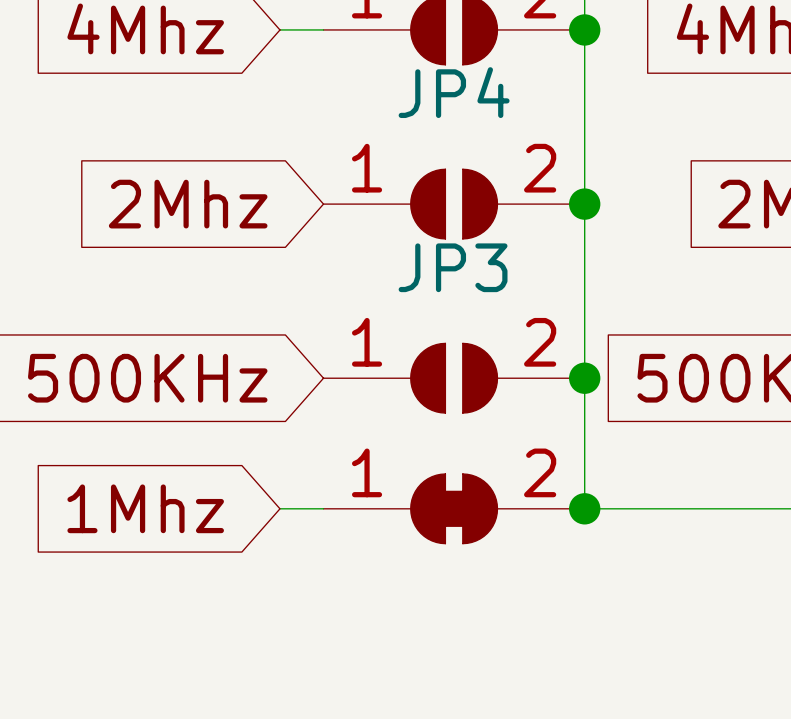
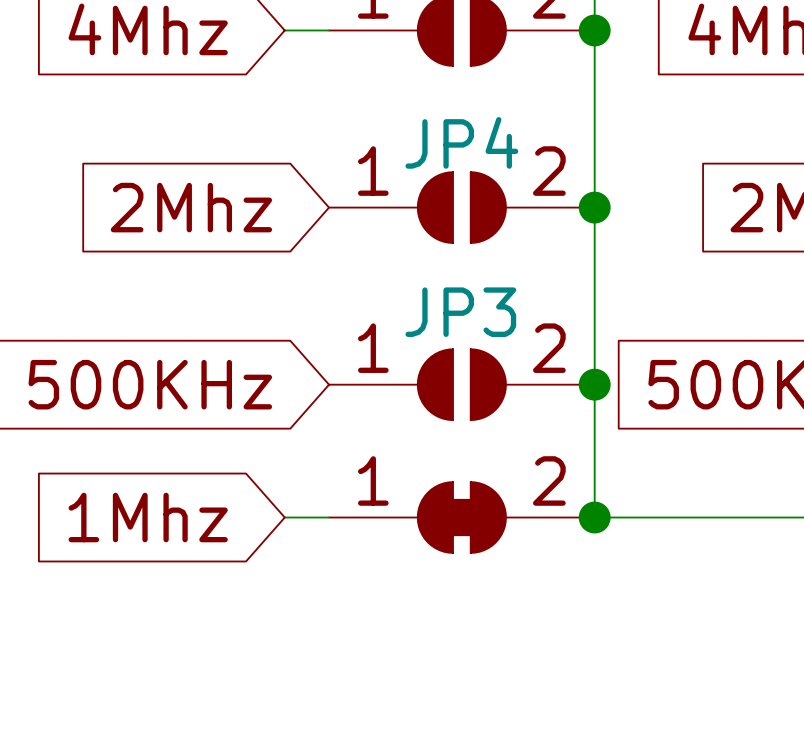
JP4 name position: JP4 (454, 92) -> JP4 (461, 142)
JP3 name position: JP3 (453, 267) -> JP3 (460, 312)

